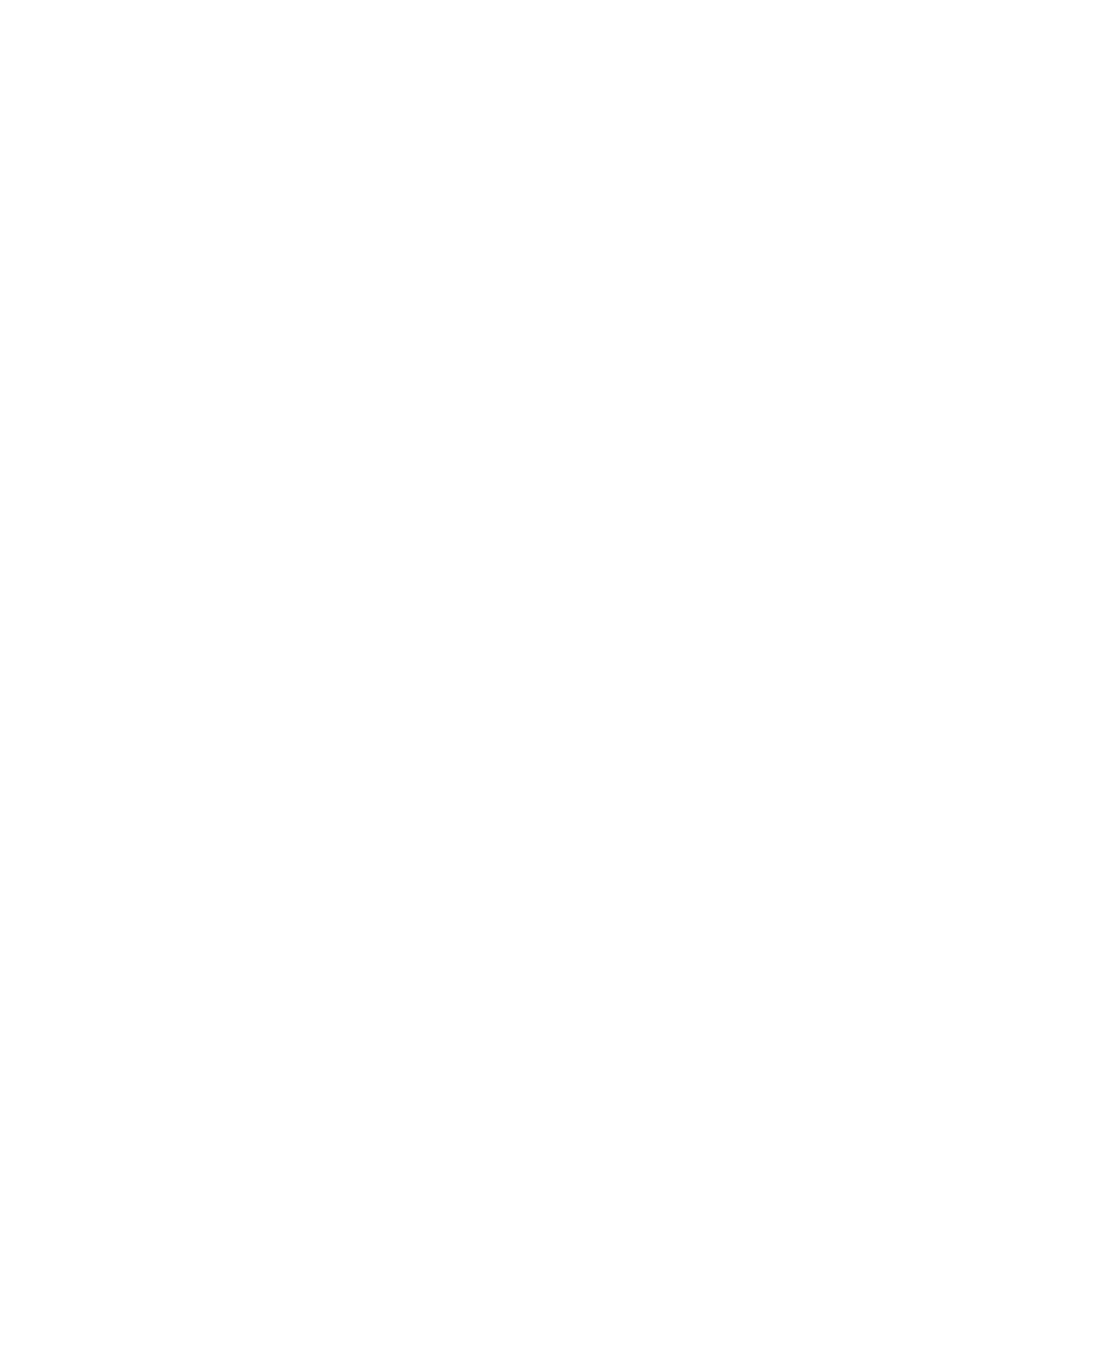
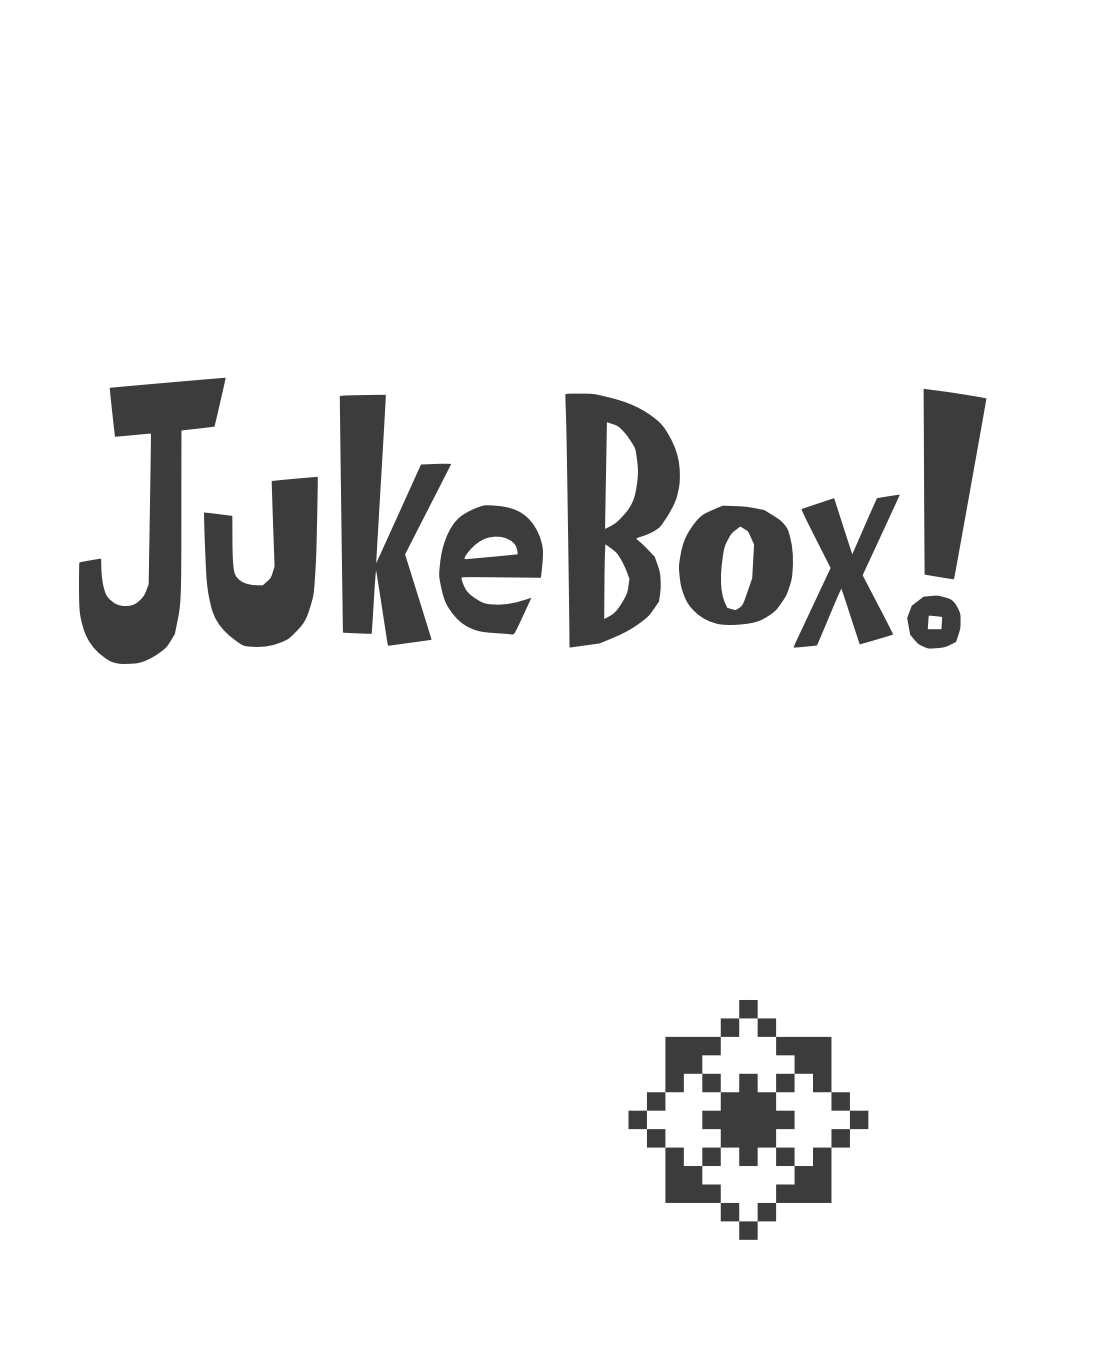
drawing: none -> [79, 377, 987, 664]
drawing: none -> [628, 999, 869, 1240]

